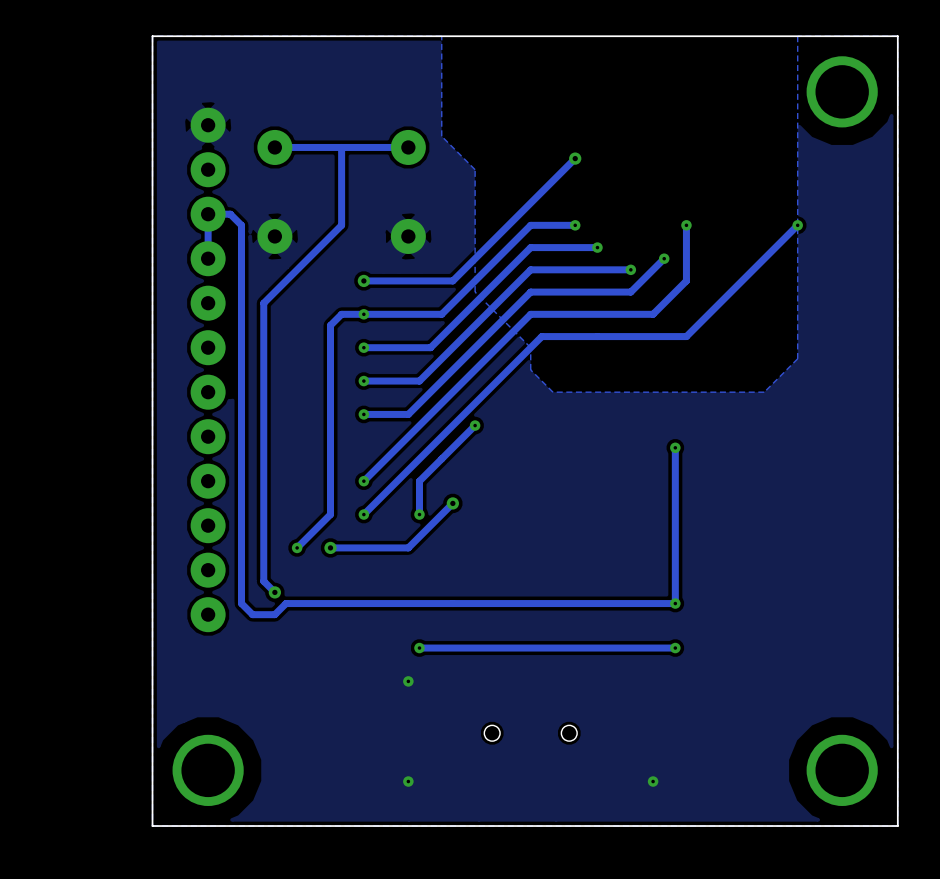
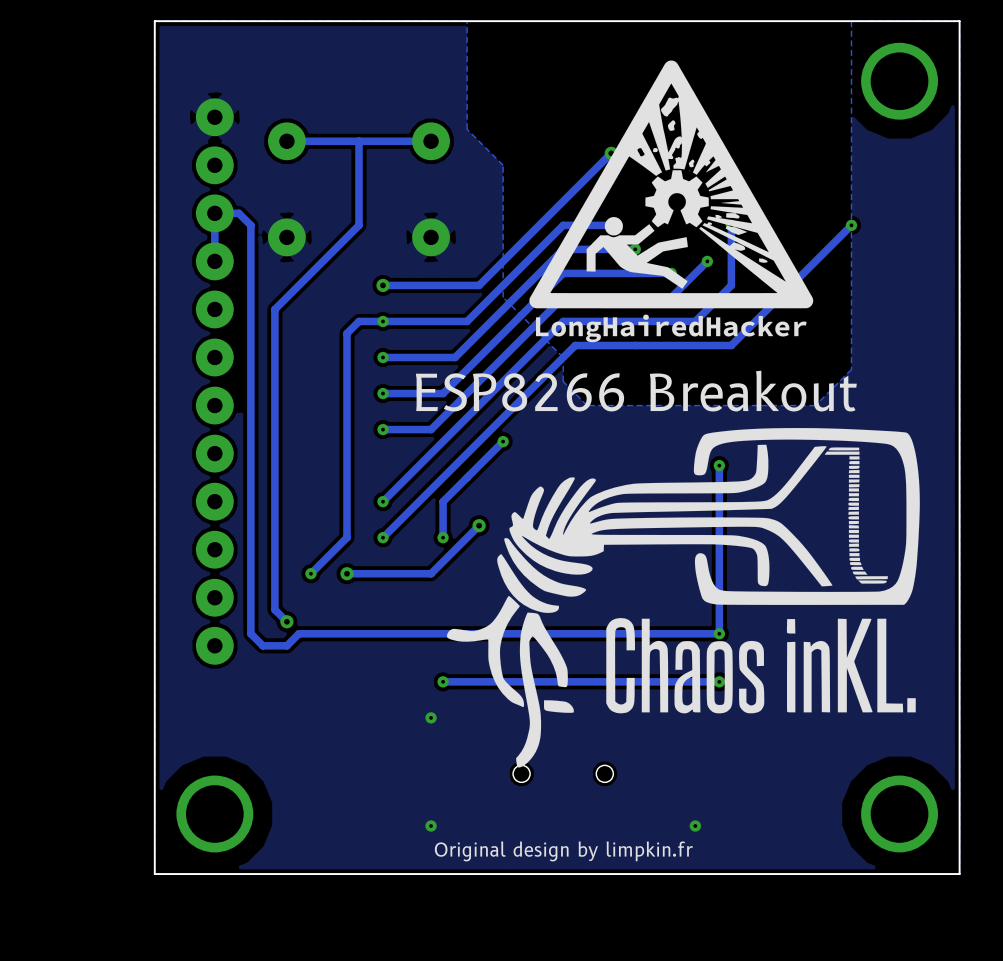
drawing: none -> [529, 60, 814, 343]
text: none -> ESP8266 Breakout (636, 391)
drawing: none -> [446, 428, 920, 768]
text: none -> Original design by limpkin.fr (563, 851)

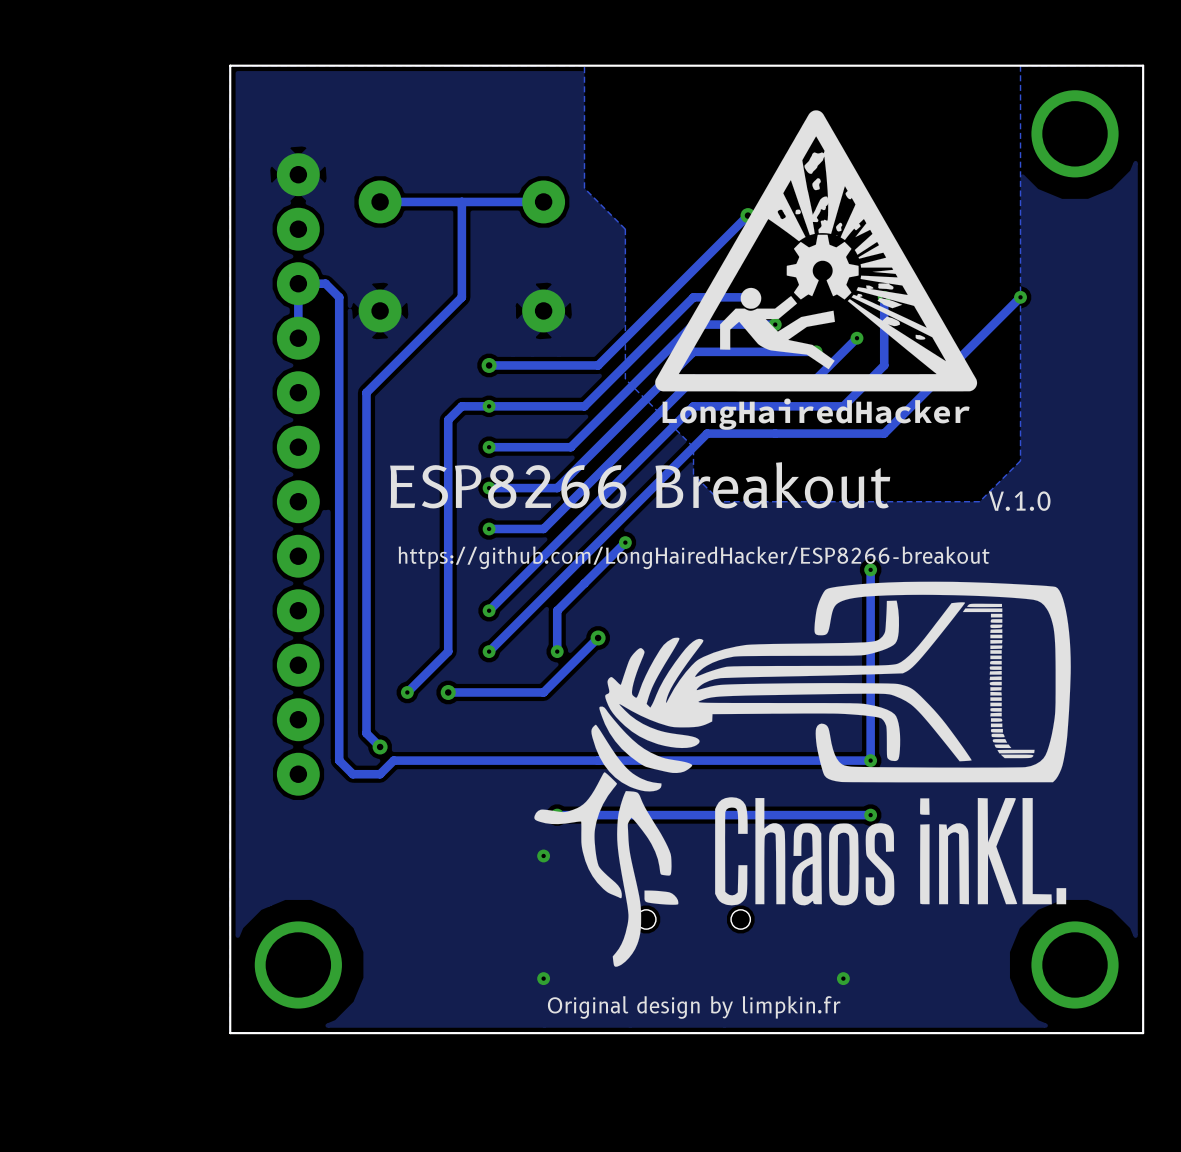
text position: ESP8266 Breakout (636, 391) -> ESP8266 Breakout (640, 485)
text: none -> V.1.0 (1019, 501)
text: none -> https://github.com/LongHairedHacker/ESP8266-breakout (694, 557)
drawing position: (683, 597) -> (802, 774)

